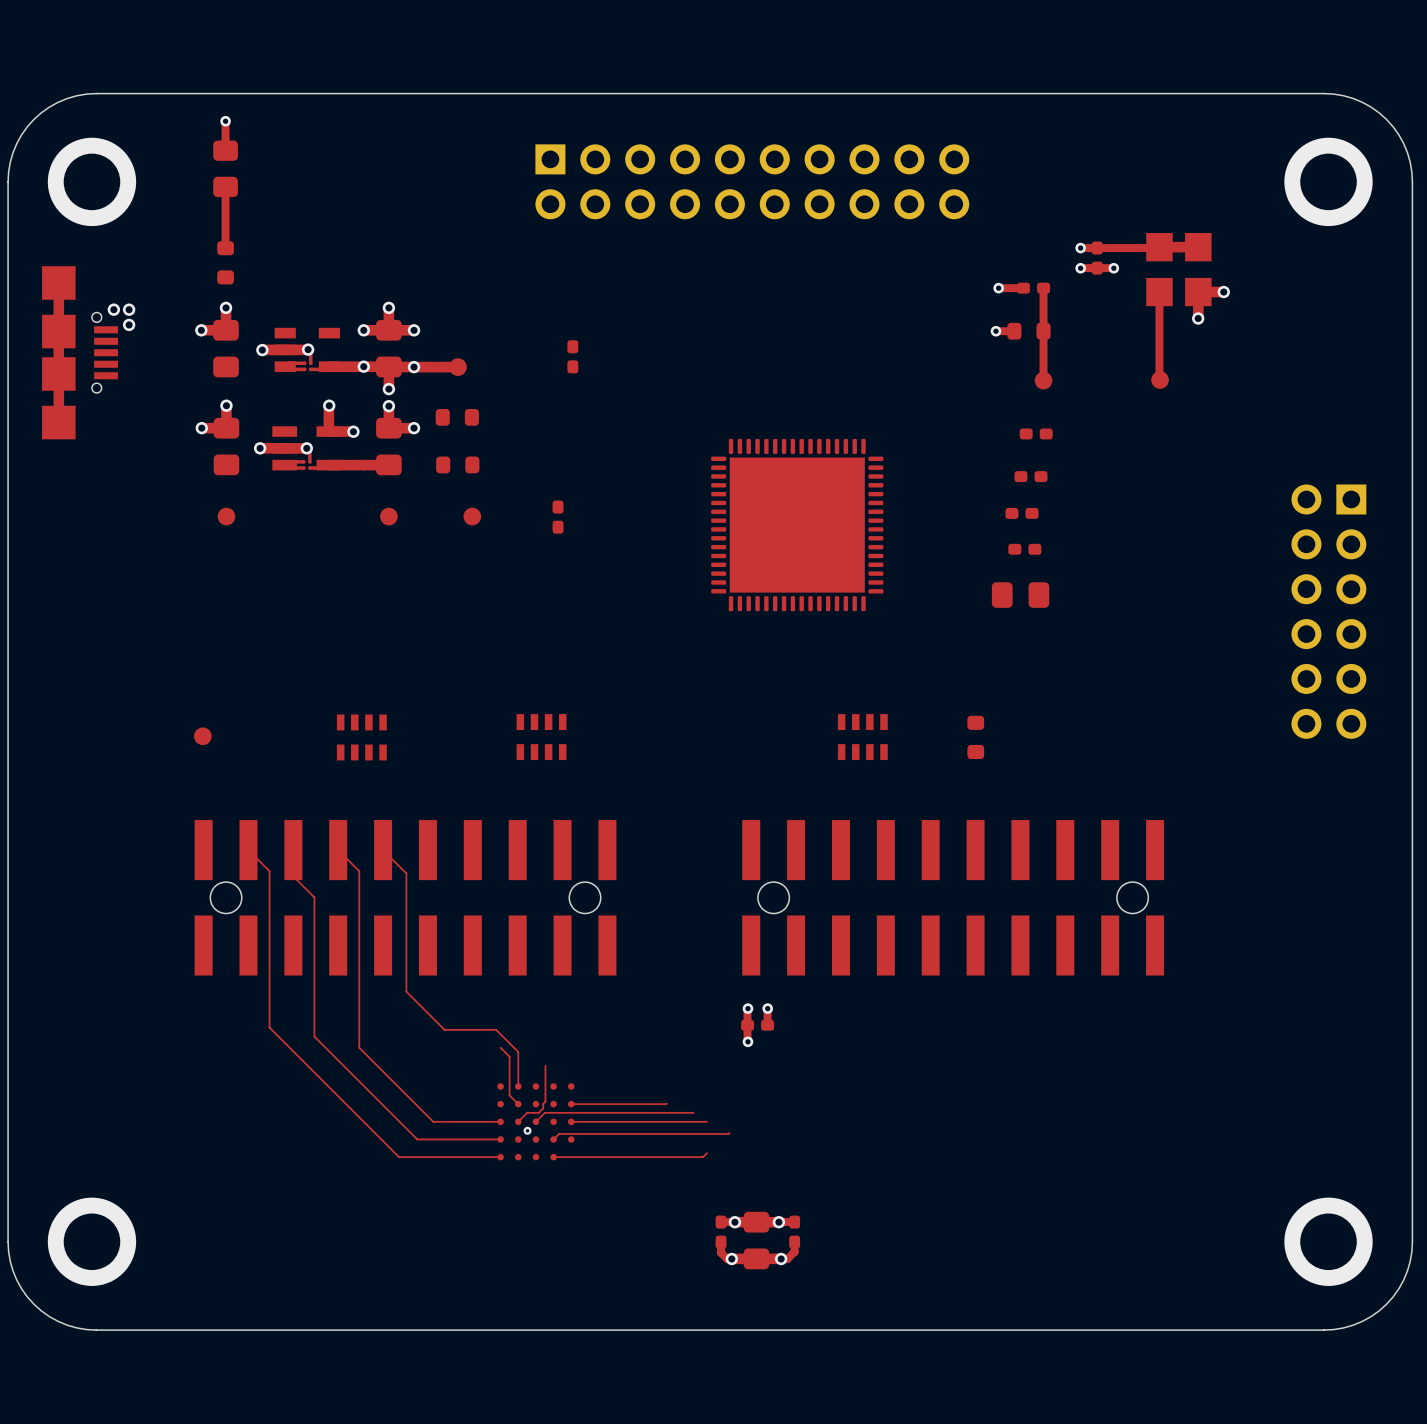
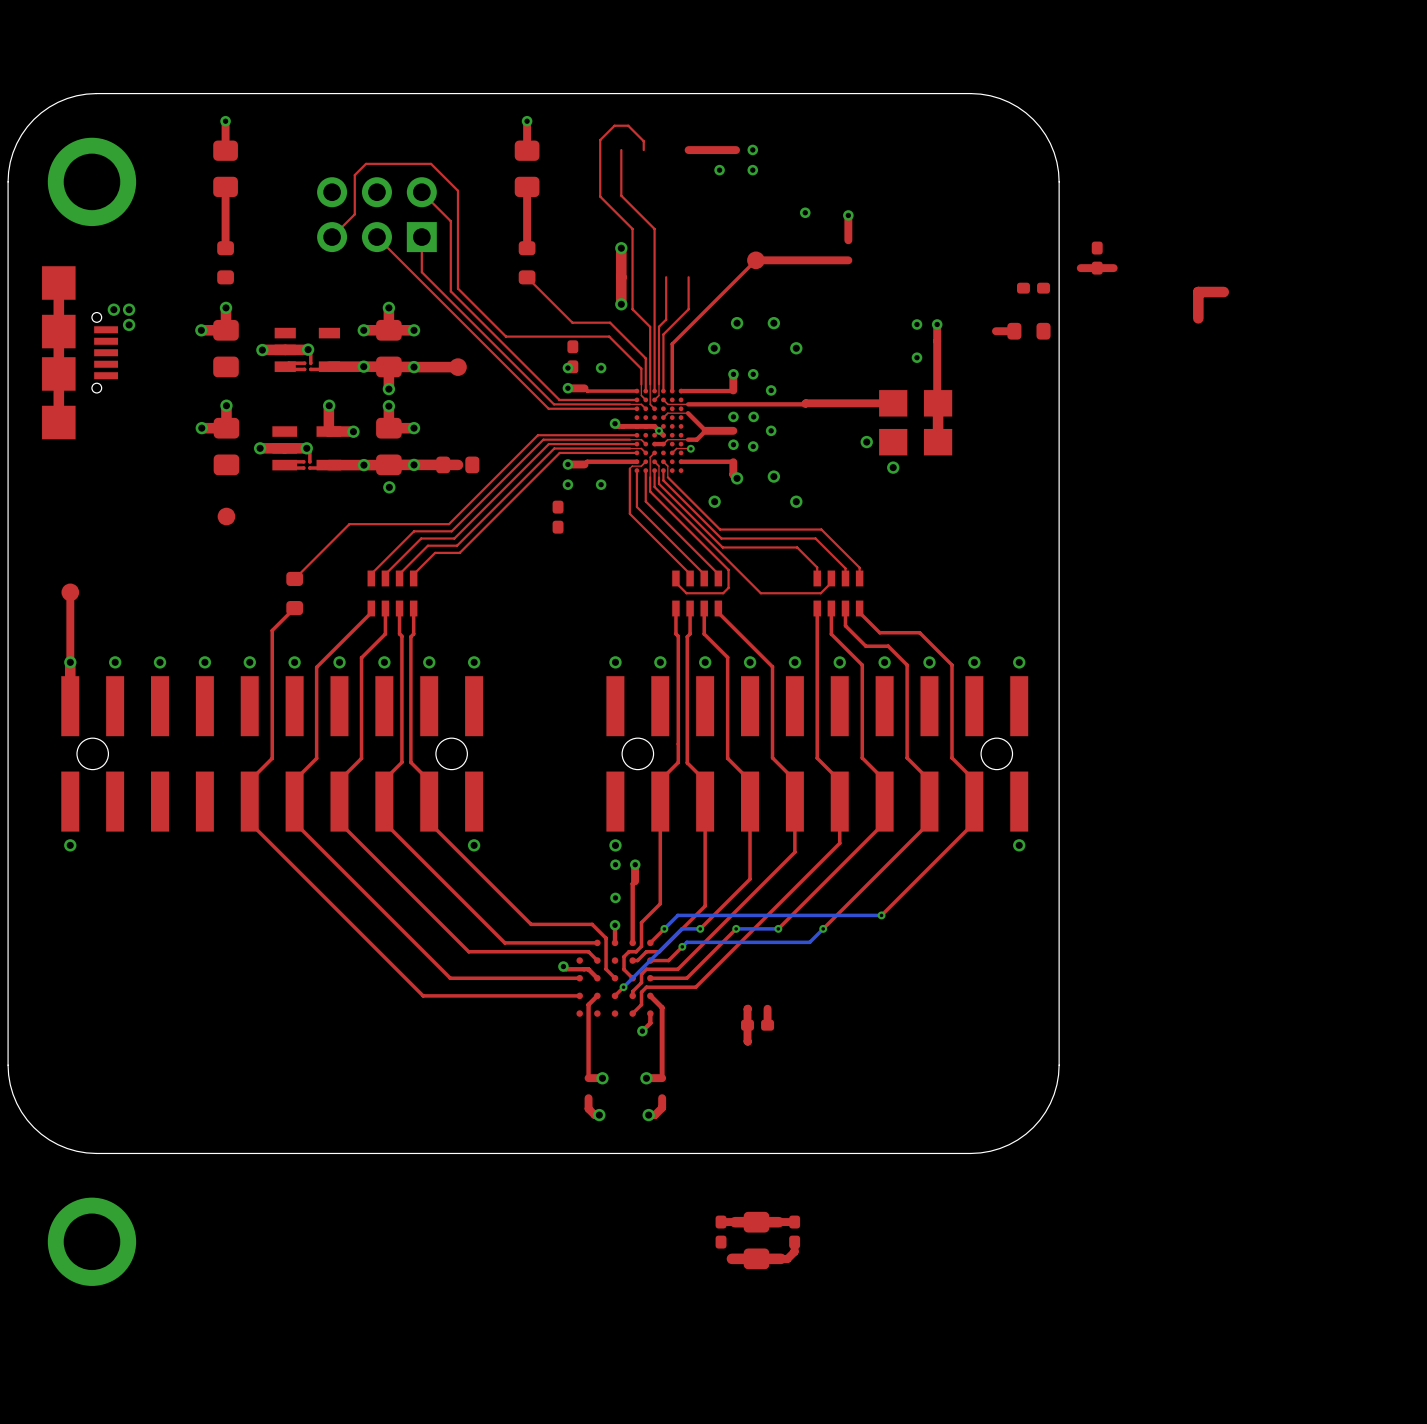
board edge: (970, 93) (1333, 94) (1362, 102) (1379, 112) (1398, 134) (1407, 152) (1412, 181) (1412, 1241) (1407, 1270) (1398, 1288) (1386, 1304) (1371, 1316) (1353, 1325) (1324, 1330) (96, 1330) (76, 1327) (58, 1321) (33, 1304) (21, 1288) (10, 1261) (8, 1241) (8, 1065) -> (970, 93) (999, 98) (1025, 112) (1039, 126) (1050, 143) (1058, 172) (1059, 1065) (1056, 1084) (1050, 1103) (1033, 1127) (1009, 1144) (990, 1151) (970, 1153) (86, 1152) (58, 1144) (33, 1127) (16, 1103) (10, 1084) (8, 1065)
top track: none -> (527, 121) (527, 150)
via: none -> (527, 121)
via: none -> (752, 149)
top track: none -> (621, 150) (621, 195) (654, 228) (654, 391)
top track: none -> (643, 150) (643, 141) (628, 125) (614, 125) (600, 140) (600, 196) (632, 228) (632, 309) (650, 326) (650, 404) (654, 408)
top track: none -> (736, 150) (688, 150)
part: none -> (527, 168)
via: none -> (719, 170)
via: none -> (752, 170)
part: (752, 181) -> none
via: (1328, 181) -> none
top track: none -> (527, 186) (527, 248)
top track: none -> (421, 192) (450, 221) (450, 291) (559, 399) (636, 399)
via: none -> (805, 212)
part: none -> (376, 214)
top track: none -> (848, 215) (848, 240)
via: none -> (848, 215)
top track: none -> (332, 237) (354, 214) (354, 175) (366, 163) (431, 163) (457, 190) (457, 288) (506, 336) (609, 336) (641, 368) (641, 395) (645, 399)
top track: none -> (376, 237) (548, 408) (636, 408)
top track: none -> (421, 237) (421, 272) (554, 404) (641, 404) (645, 408)
top track: (1198, 247) (1080, 248) -> none
top track: none -> (621, 248) (621, 304)
via: none -> (621, 248)
via: (1080, 248) -> none
part: none -> (755, 260)
top track: none -> (848, 260) (755, 260) (672, 344) (672, 391)
part: none -> (527, 262)
via: (1080, 268) -> none
via: (1113, 268) -> none
part rotation: 0° (1178, 269) -> 90° clockwise (915, 422)
part position: (1178, 269) -> (915, 422)
top track: none -> (527, 277) (572, 322) (610, 322) (645, 358) (645, 391)
top track: none -> (666, 277) (666, 319) (658, 326) (658, 395) (654, 399)
top track: none -> (688, 277) (688, 309) (663, 334) (663, 391)
via: (998, 288) -> none
top track: (1023, 288) (998, 288) -> none
top track: (1043, 288) (1043, 380) -> none
top track: (1159, 292) (1159, 379) -> none
via: (1223, 292) -> none
via: none -> (621, 304)
via: (1198, 318) -> none
via: none -> (737, 323)
via: none -> (773, 323)
via: none -> (917, 324)
top track: none -> (937, 324) (938, 442)
via: none -> (937, 324)
via: (995, 331) -> none
via: none -> (714, 348)
via: none -> (796, 348)
via: none -> (917, 357)
via: none -> (567, 368)
via: none -> (601, 368)
top track: none -> (733, 374) (732, 391) (681, 391)
via: none -> (733, 374)
via: none -> (753, 374)
part: (1160, 379) -> none
part: (1043, 380) -> none
via: none -> (567, 388)
top track: none -> (568, 388) (584, 388) (587, 391) (636, 391)
via: none -> (771, 390)
top track: none -> (663, 399) (667, 404) (893, 403)
via: none -> (733, 416)
via: none -> (753, 416)
part: (457, 417) -> none
top track: none -> (663, 417) (667, 413) (688, 413) (705, 430)
top track: none -> (615, 423) (617, 426) (654, 426) (663, 435)
via: none -> (615, 423)
part: none -> (659, 430)
via: none -> (659, 430)
top track: none -> (705, 430) (696, 439) (667, 439) (663, 444) (654, 444)
top track: none -> (733, 430) (705, 430)
via: none -> (771, 430)
part: (1036, 433) -> none
top track: none -> (636, 435) (537, 435) (449, 524) (349, 524) (294, 578)
via: none -> (866, 442)
top track: none -> (636, 444) (548, 444) (454, 538) (421, 538) (385, 574) (385, 578)
top track: none -> (645, 444) (641, 439) (543, 439) (451, 531) (414, 531) (371, 574) (371, 578)
via: none -> (733, 444)
via: none -> (753, 446)
top track: none -> (690, 448) (676, 448) (672, 452)
via: none -> (690, 448)
top track: none -> (636, 452) (559, 452) (459, 552) (435, 552) (413, 574) (413, 578)
top track: none -> (645, 452) (641, 448) (554, 448) (457, 545) (427, 545) (399, 574) (399, 578)
top track: none -> (654, 452) (650, 457) (650, 491) (728, 569) (728, 587) (723, 593) (686, 593) (675, 582) (675, 578)
top track: none -> (636, 461) (587, 461) (584, 464) (567, 464)
top track: none -> (645, 461) (641, 466) (632, 466) (629, 468) (629, 513) (690, 574) (690, 578)
top track: none -> (654, 461) (658, 466) (658, 483) (722, 547) (797, 547) (817, 567) (817, 578)
top track: none -> (663, 461) (667, 466) (667, 477) (720, 529) (821, 529) (859, 567) (859, 578)
top track: none -> (681, 461) (732, 461) (733, 474) (737, 478)
via: none -> (414, 464)
top track: none -> (457, 464) (388, 464)
via: none -> (567, 464)
via: none -> (363, 465)
via: none -> (893, 467)
top track: none -> (636, 470) (636, 507) (704, 574) (704, 578)
top track: none -> (645, 470) (645, 501) (718, 574) (718, 578)
top track: none -> (654, 470) (654, 486) (760, 593) (820, 593) (831, 582) (831, 578)
top track: none -> (663, 470) (663, 480) (721, 538) (815, 538) (845, 568) (845, 578)
via: none -> (773, 476)
part: (1030, 476) -> none
via: none -> (737, 478)
via: none -> (567, 484)
via: none -> (601, 484)
via: none -> (389, 487)
via: none -> (714, 501)
via: none -> (796, 501)
part: (1021, 513) -> none
part: (388, 516) -> none
part: (472, 516) -> none
part: (797, 525) -> none
part: (1024, 549) -> none
top track: none -> (70, 592) (70, 706)
part: none -> (70, 592)
part: none -> (294, 593)
part: none -> (392, 593)
part: none -> (697, 593)
part: none -> (838, 593)
part: (1020, 595) -> none
top track: none -> (294, 608) (272, 630) (272, 758) (249, 780) (249, 822) (423, 995) (579, 995)
top track: none -> (371, 608) (371, 612) (316, 667) (316, 758) (294, 780) (294, 822) (450, 978) (579, 978)
top track: none -> (385, 608) (385, 633) (361, 657) (361, 758) (339, 780) (339, 822) (468, 951) (588, 951) (597, 960)
top track: none -> (399, 608) (399, 633) (401, 636) (401, 762) (384, 779) (384, 822) (504, 942) (597, 942)
top track: none -> (413, 608) (413, 633) (410, 636) (410, 762) (429, 780) (429, 822) (531, 924) (592, 924) (606, 938) (606, 969) (615, 978)
top track: none -> (675, 608) (675, 633) (678, 636) (678, 762) (660, 780) (660, 903) (641, 922) (641, 946) (636, 951) (628, 951) (624, 956) (624, 969) (632, 978)
top track: none -> (690, 608) (690, 633) (687, 636) (687, 762) (705, 780) (705, 906) (659, 951) (646, 951) (637, 960) (632, 960)
top track: none -> (704, 608) (704, 633) (727, 657) (727, 758) (750, 780) (750, 879) (700, 928)
top track: none -> (718, 608) (718, 612) (772, 666) (772, 757) (794, 780) (794, 852) (677, 969) (646, 969) (641, 974) (641, 982) (632, 991) (632, 995)
top track: none -> (817, 608) (817, 758) (839, 780) (839, 843) (695, 987) (646, 987) (641, 992) (641, 1004) (632, 1013)
top track: none -> (831, 608) (831, 634) (862, 665) (862, 757) (884, 780) (884, 822) (778, 928)
top track: none -> (845, 608) (845, 625) (865, 646) (888, 646) (907, 665) (907, 757) (929, 780) (929, 822) (823, 928)
top track: none -> (859, 608) (859, 612) (879, 632) (919, 632) (952, 665) (952, 757) (974, 780) (974, 822) (881, 915)
part: (1328, 611) -> none
via: none -> (70, 662)
via: none -> (115, 662)
via: none -> (160, 662)
via: none -> (204, 662)
via: none -> (249, 662)
via: none -> (294, 662)
via: none -> (339, 662)
via: none -> (384, 662)
via: none -> (429, 662)
via: none -> (474, 662)
via: none -> (615, 662)
via: none -> (660, 662)
via: none -> (705, 662)
via: none -> (750, 662)
via: none -> (794, 662)
via: none -> (839, 662)
via: none -> (884, 662)
via: none -> (929, 662)
via: none -> (974, 662)
via: none -> (1019, 662)
part: (202, 736) -> none
part: (361, 737) -> none
part: (541, 737) -> none
part: (862, 737) -> none
part: (975, 737) -> none
via: none -> (70, 845)
via: none -> (474, 845)
via: none -> (615, 845)
via: none -> (1019, 845)
top track: (248, 850) (269, 871) (269, 1027) (399, 1157) (500, 1157) -> none
top track: (293, 850) (293, 876) (314, 897) (314, 1036) (417, 1139) (500, 1139) -> none
top track: (338, 850) (359, 871) (359, 1047) (433, 1121) (500, 1121) -> none
top track: (383, 850) (406, 873) (406, 991) (444, 1029) (496, 1029) (518, 1051) (518, 1086) -> none
via: none -> (615, 864)
top track: none -> (635, 864) (635, 881) (632, 883) (632, 942)
via: none -> (635, 864)
part position: (405, 897) -> (272, 753)
via: none -> (615, 897)
part position: (953, 897) -> (817, 753)
bottom track: none -> (881, 915) (677, 915) (664, 928)
via: none -> (881, 915)
top track: none -> (615, 925) (615, 942)
via: none -> (615, 925)
top track: none -> (664, 928) (650, 942)
via: none -> (664, 928)
bottom track: none -> (700, 928) (681, 928) (623, 987)
via: none -> (700, 928)
top track: none -> (736, 928) (686, 978) (650, 978)
via: none -> (736, 928)
bottom track: none -> (778, 928) (736, 928)
via: none -> (778, 928)
bottom track: none -> (823, 928) (809, 942) (686, 942) (682, 946)
via: none -> (823, 928)
top track: none -> (682, 946) (668, 960) (650, 960)
via: none -> (682, 946)
top track: none -> (563, 966) (566, 969) (588, 969) (597, 978)
via: none -> (563, 966)
top track: none -> (623, 987) (615, 995)
via: none -> (623, 987)
top track: none -> (597, 995) (588, 1004) (588, 1078) (602, 1078)
top track: none -> (650, 995) (662, 1007) (662, 1078) (646, 1078)
via: (747, 1008) -> none
via: (767, 1008) -> none
top track: none -> (650, 1013) (650, 1023) (642, 1031)
via: none -> (642, 1031)
via: (747, 1041) -> none
top track: (500, 1047) (509, 1056) (509, 1095) (518, 1104) -> none
top track: (545, 1065) (545, 1101) (543, 1108) (538, 1112) (527, 1112) (518, 1121) -> none
via: none -> (602, 1078)
via: none -> (646, 1078)
top track: none -> (662, 1098) (662, 1107) (654, 1115) (648, 1115)
top track: (666, 1103) (571, 1104) -> none
top track: (693, 1112) (544, 1112) (535, 1121) -> none
via: none -> (599, 1115)
via: none -> (648, 1115)
part rotation: 0° (535, 1121) -> 180° (615, 978)
part position: (535, 1121) -> (615, 978)
top track: (707, 1121) (571, 1121) -> none
via: (527, 1130) -> none
top track: (729, 1133) (559, 1133) (553, 1139) -> none
top track: (707, 1153) (703, 1157) (553, 1157) -> none
via: (734, 1222) -> none
via: (778, 1222) -> none
via: (1328, 1241) -> none
top track: (721, 1242) (721, 1252) (727, 1258) (731, 1258) -> (588, 1098) (588, 1108) (594, 1115) (599, 1115)
via: (731, 1258) -> none
via: (781, 1258) -> none

